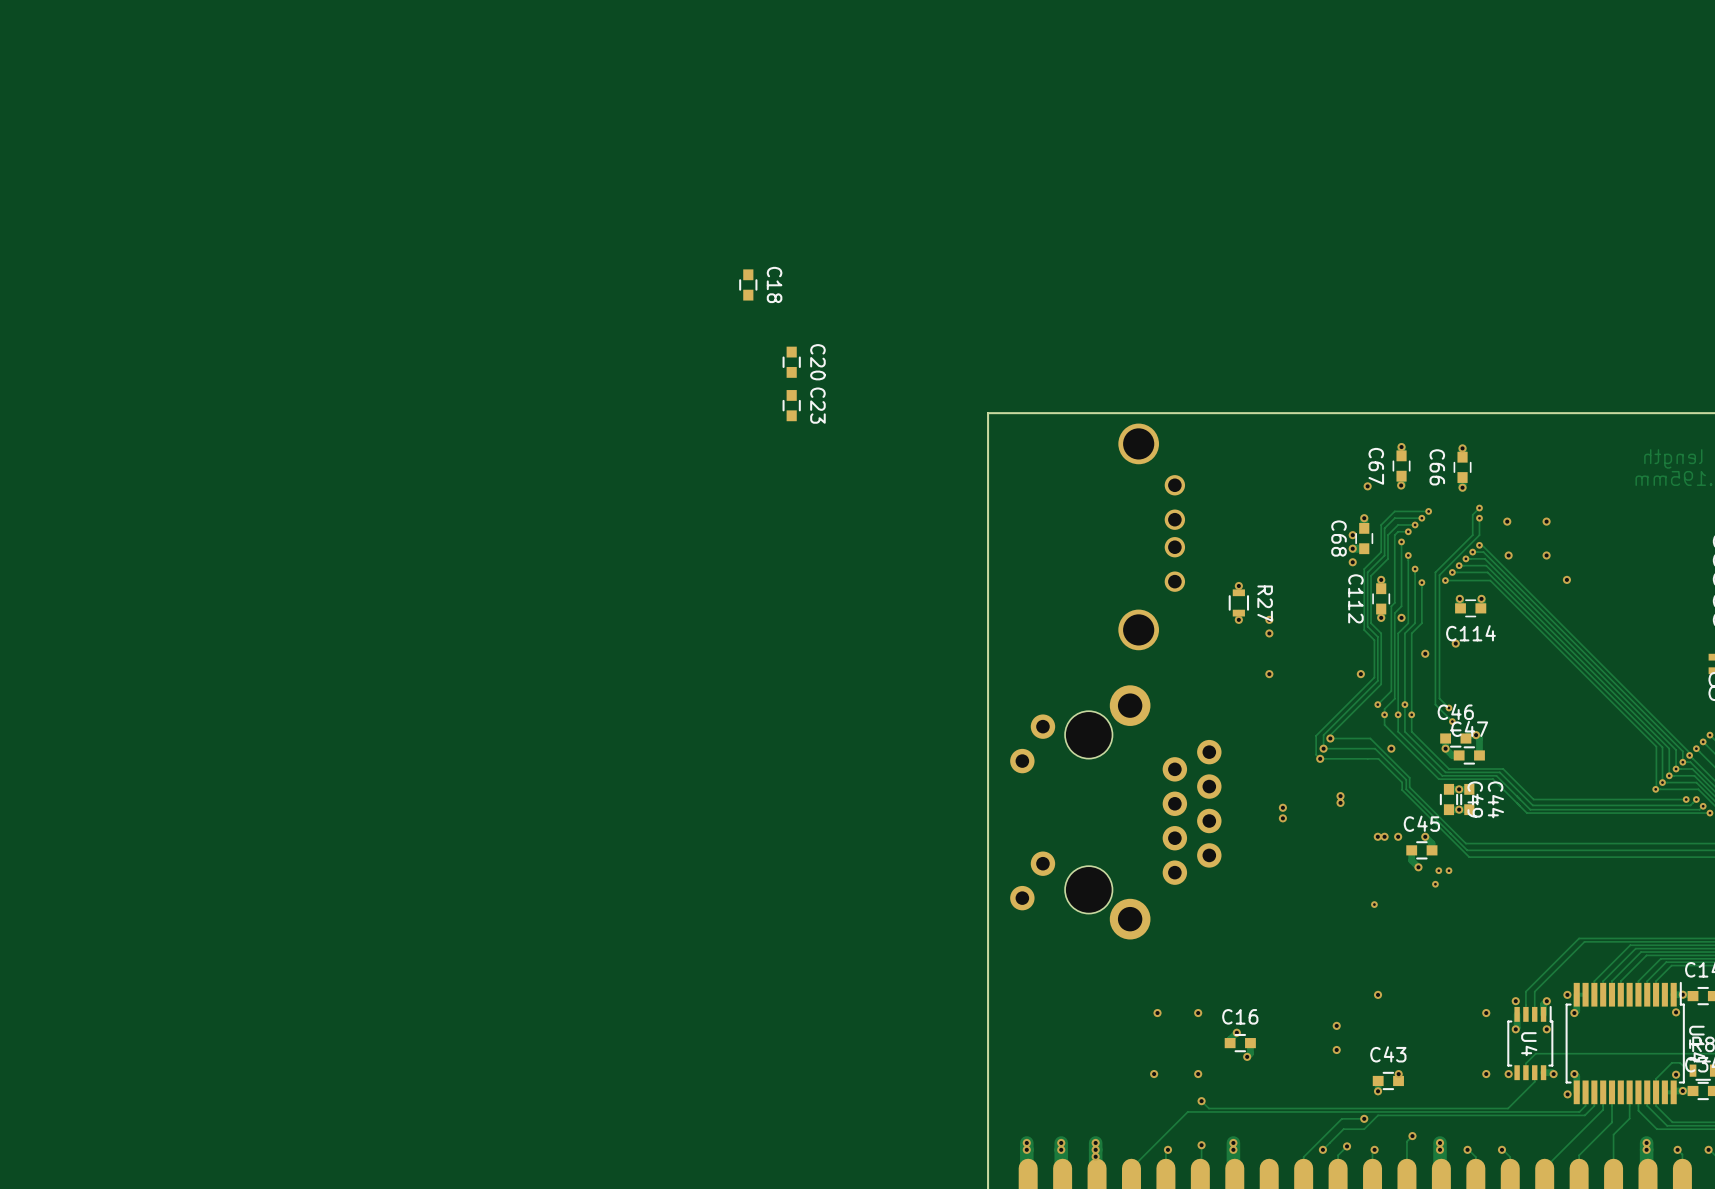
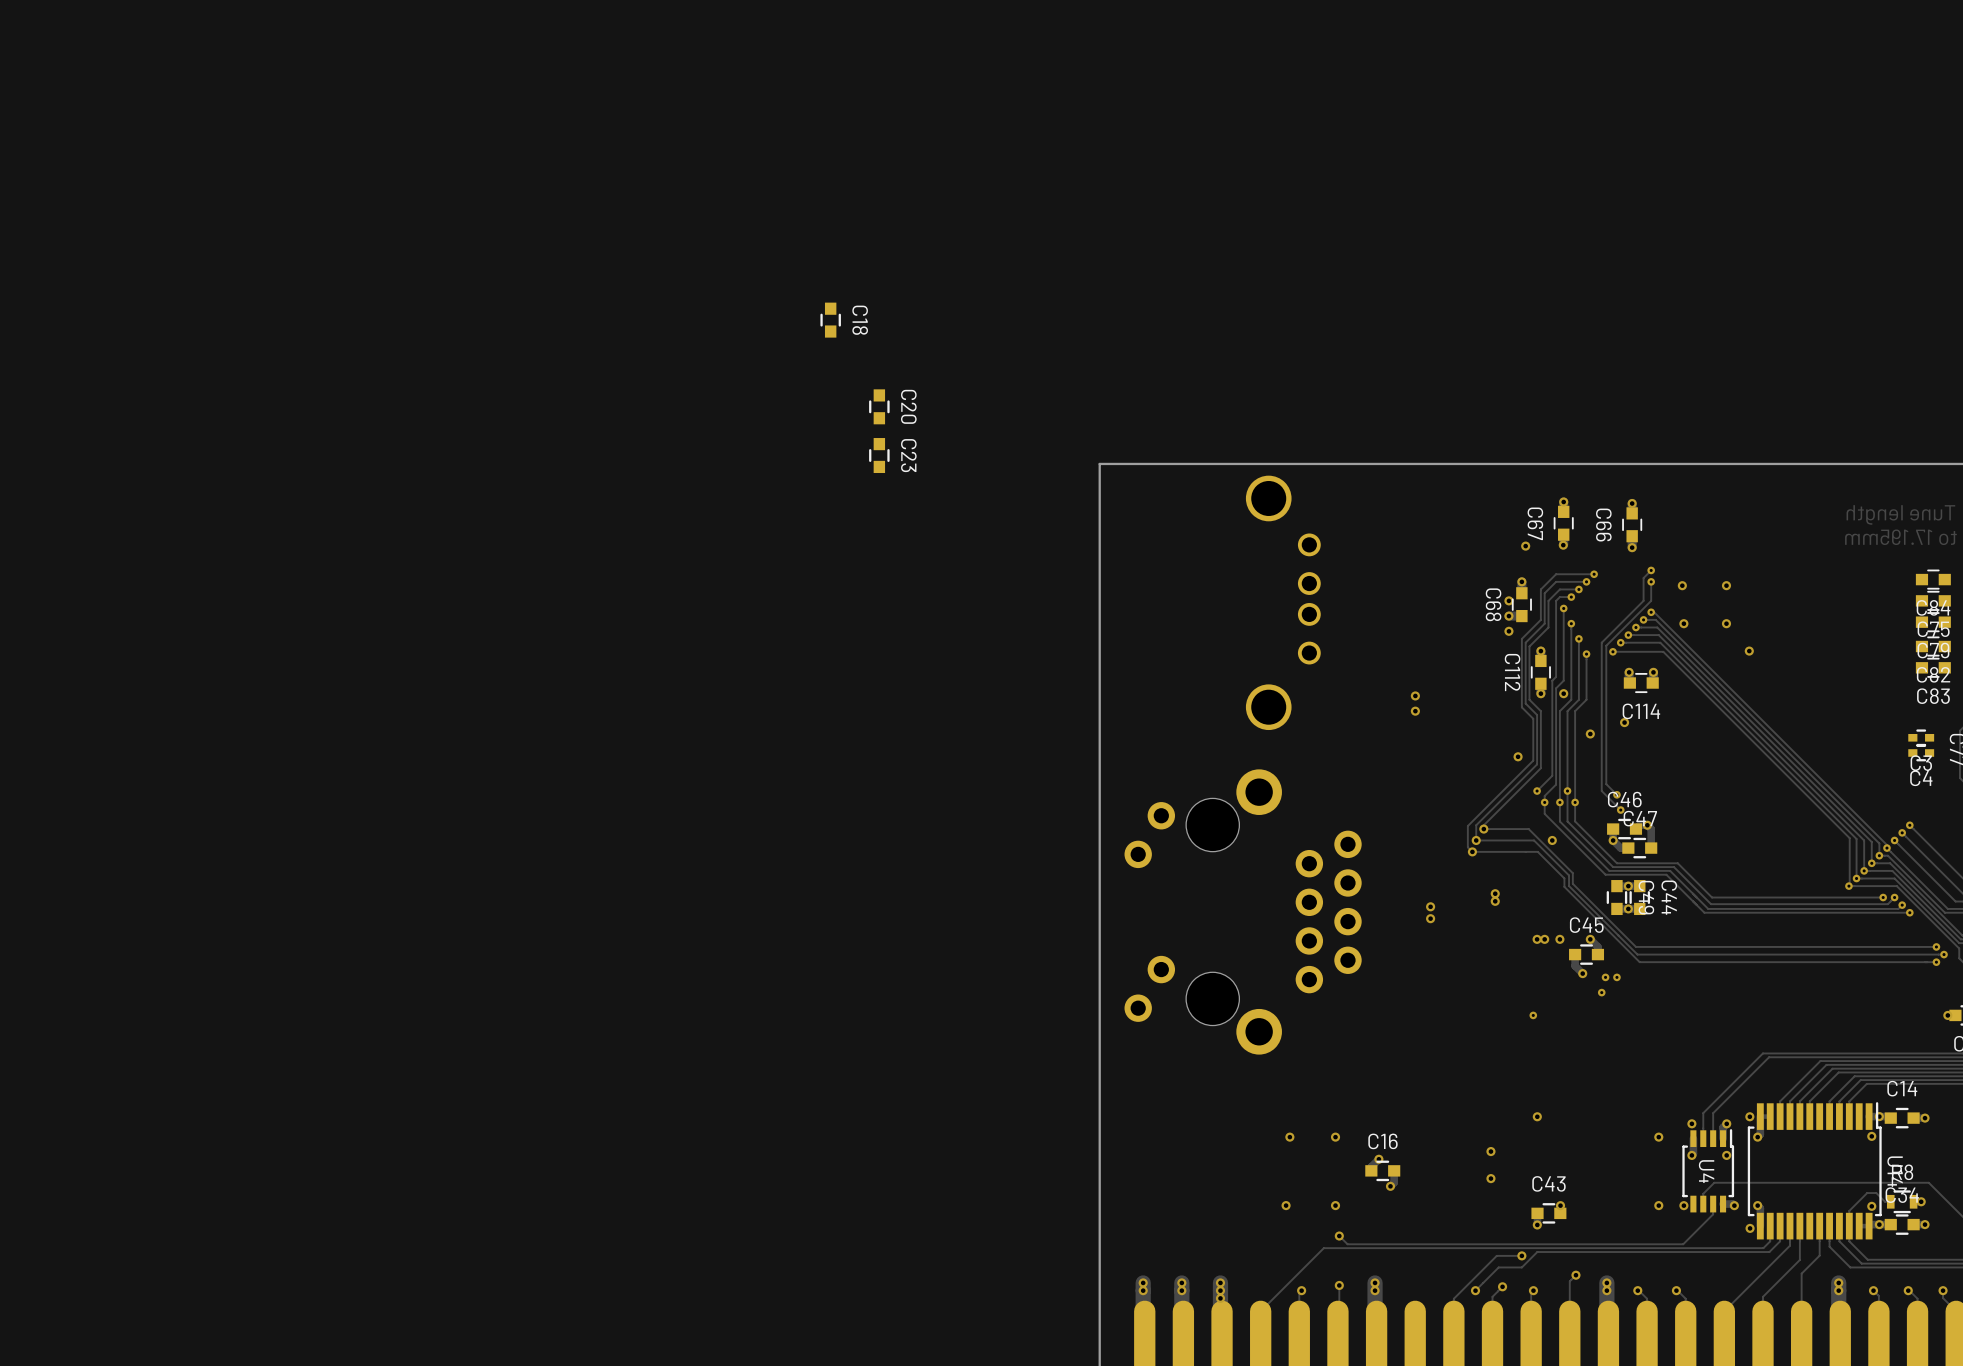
via: (1238, 585) -> none
R27: (1238, 602) -> none
via: (1238, 619) -> none
via: (1269, 674) -> none

